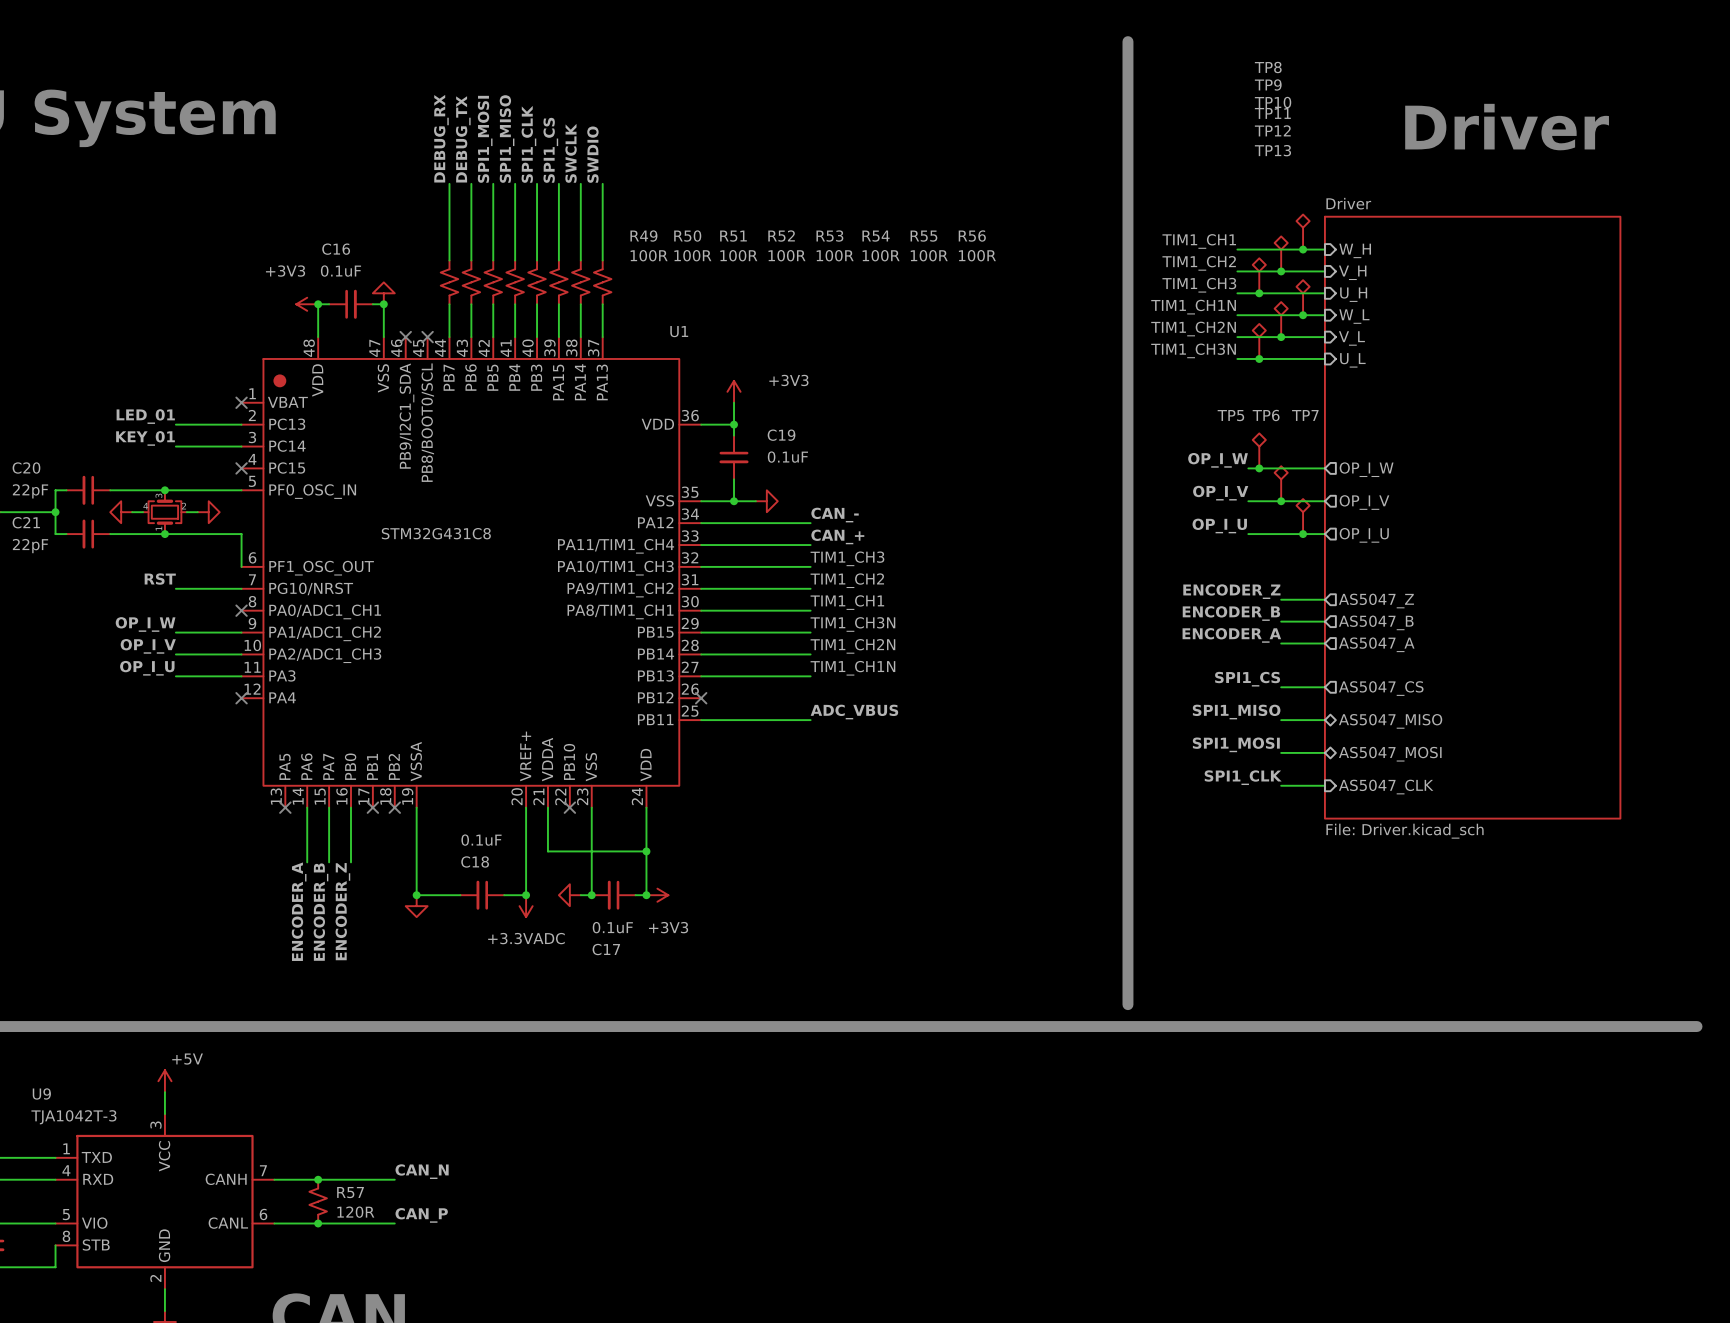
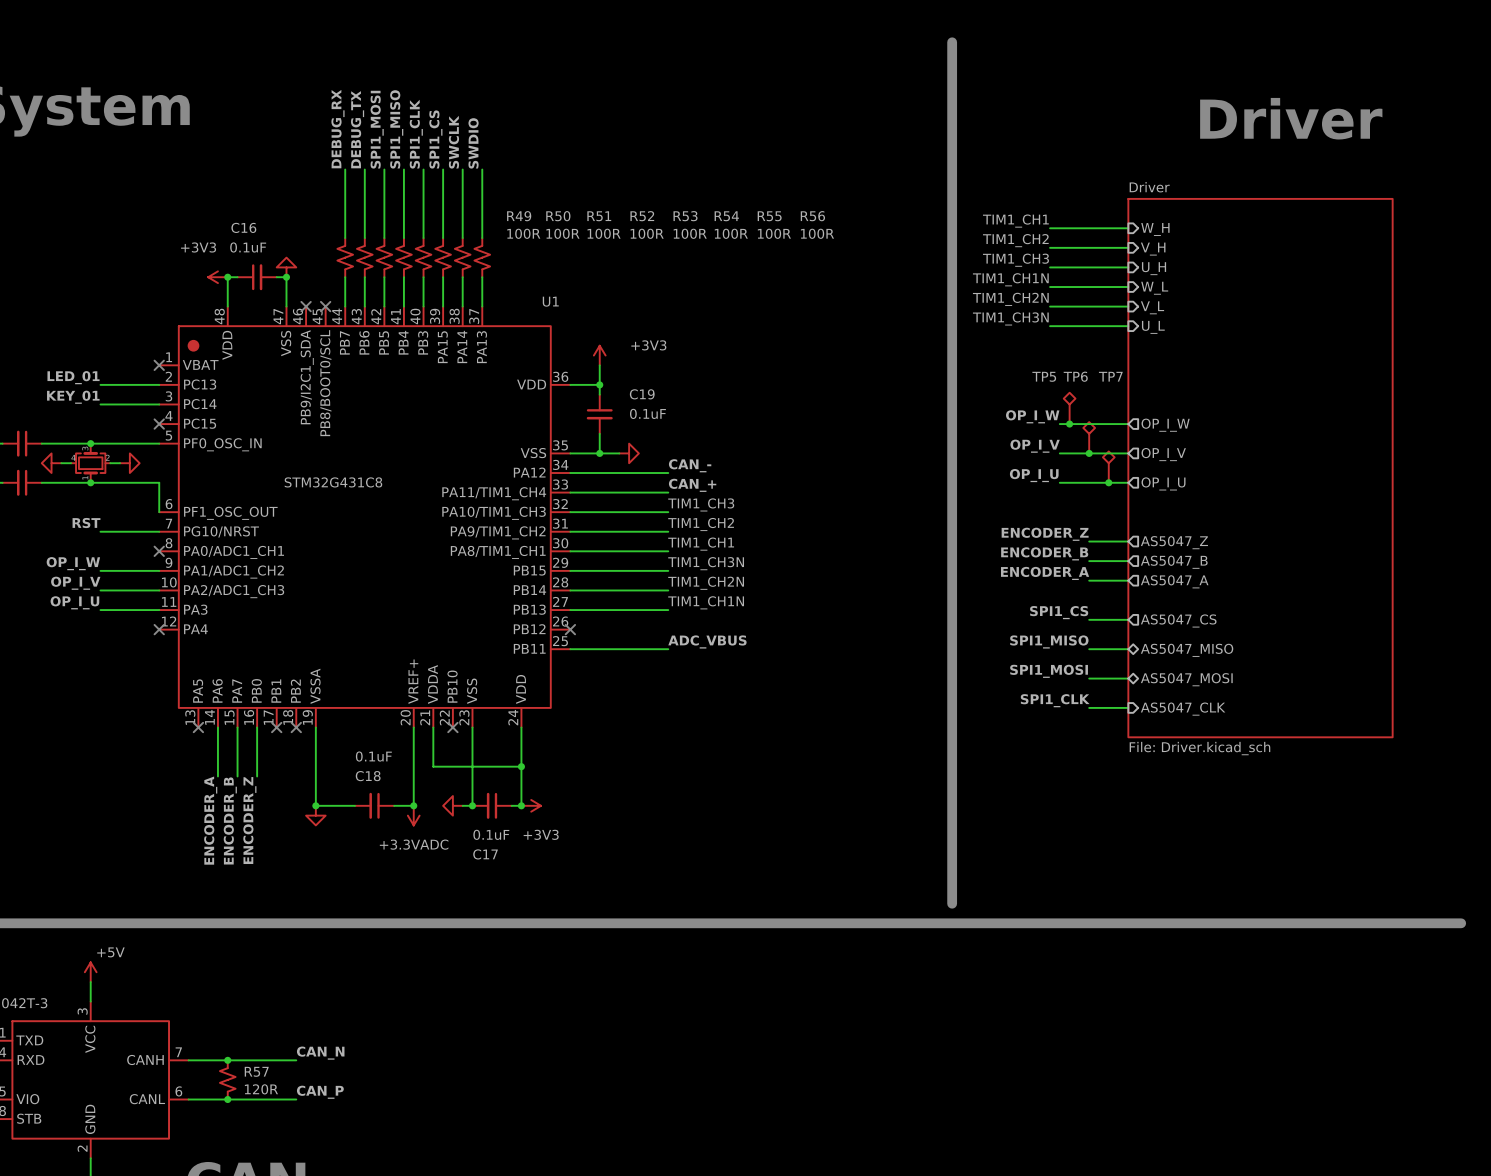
TP8: (1303, 232) -> none
junction: (1303, 249) -> none
TP9: (1281, 253) -> none
junction: (1281, 271) -> none
TP10: (1259, 275) -> none
junction: (1259, 293) -> none
TP11: (1303, 297) -> none
junction: (1303, 315) -> none
TP12: (1281, 319) -> none
junction: (1281, 337) -> none
TP13: (1259, 341) -> none
junction: (1259, 358) -> none

